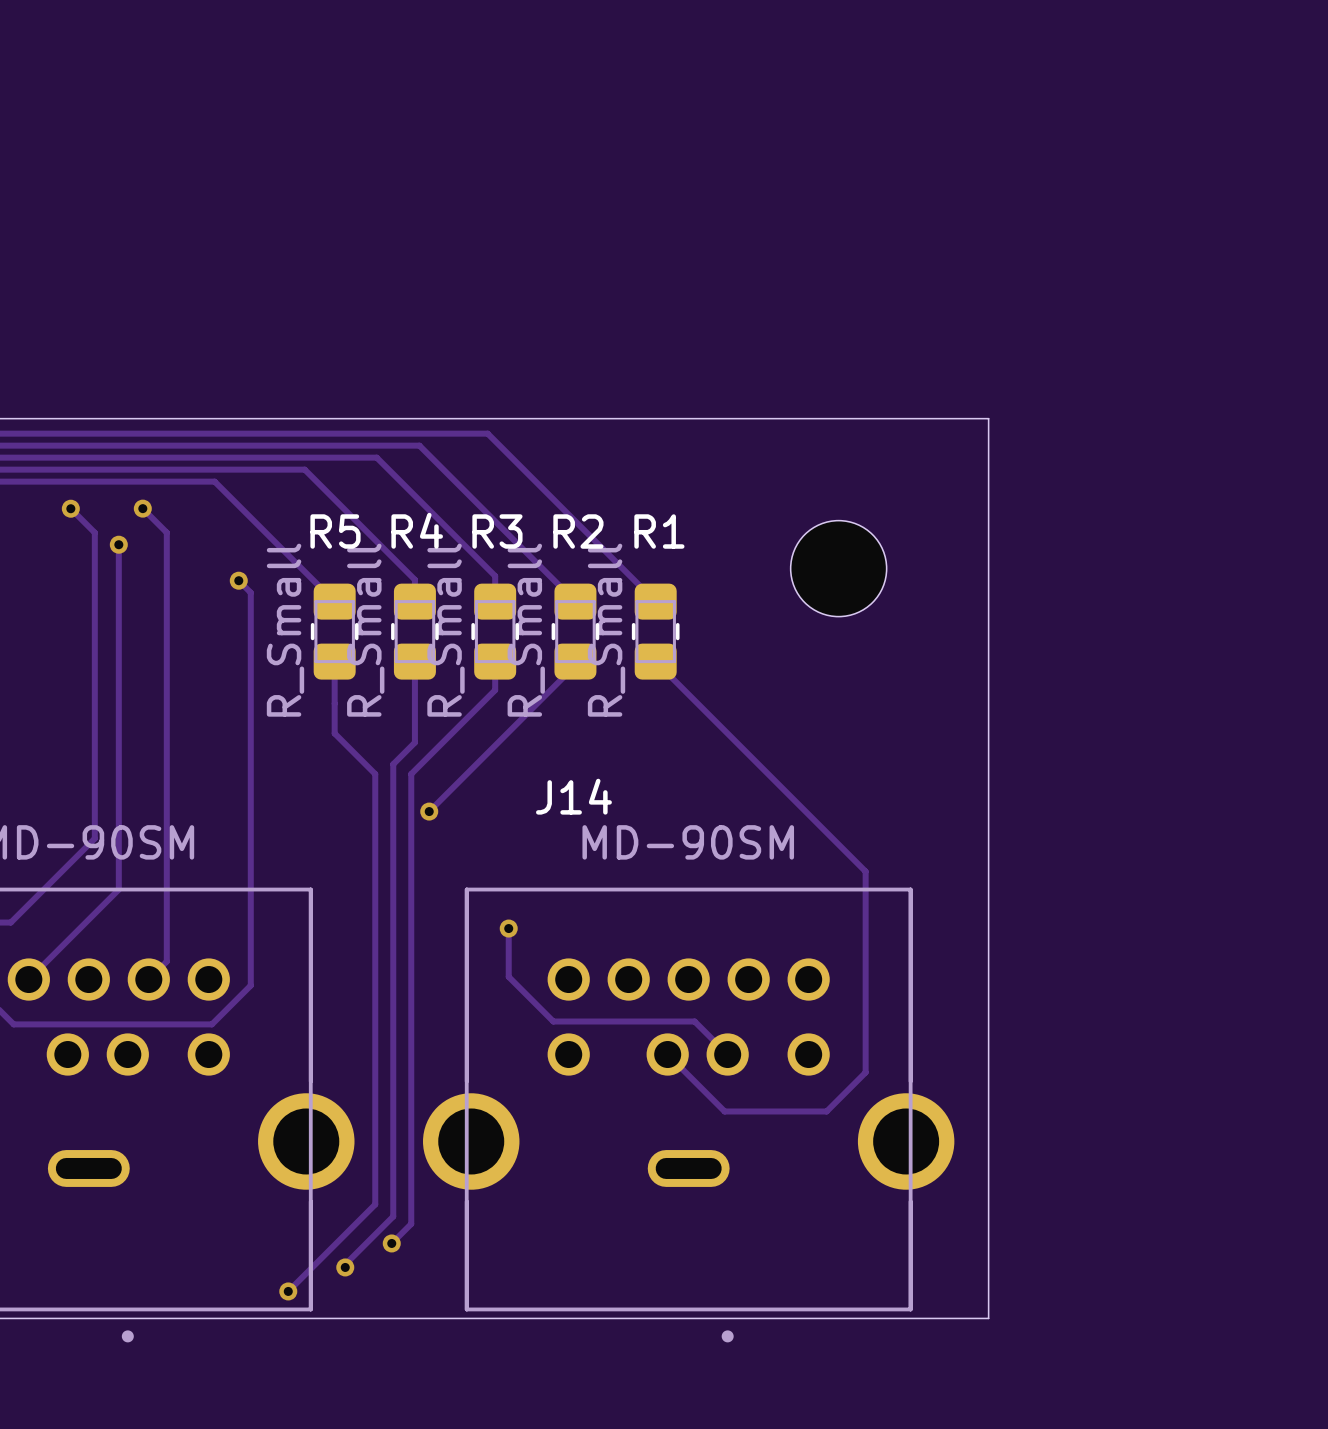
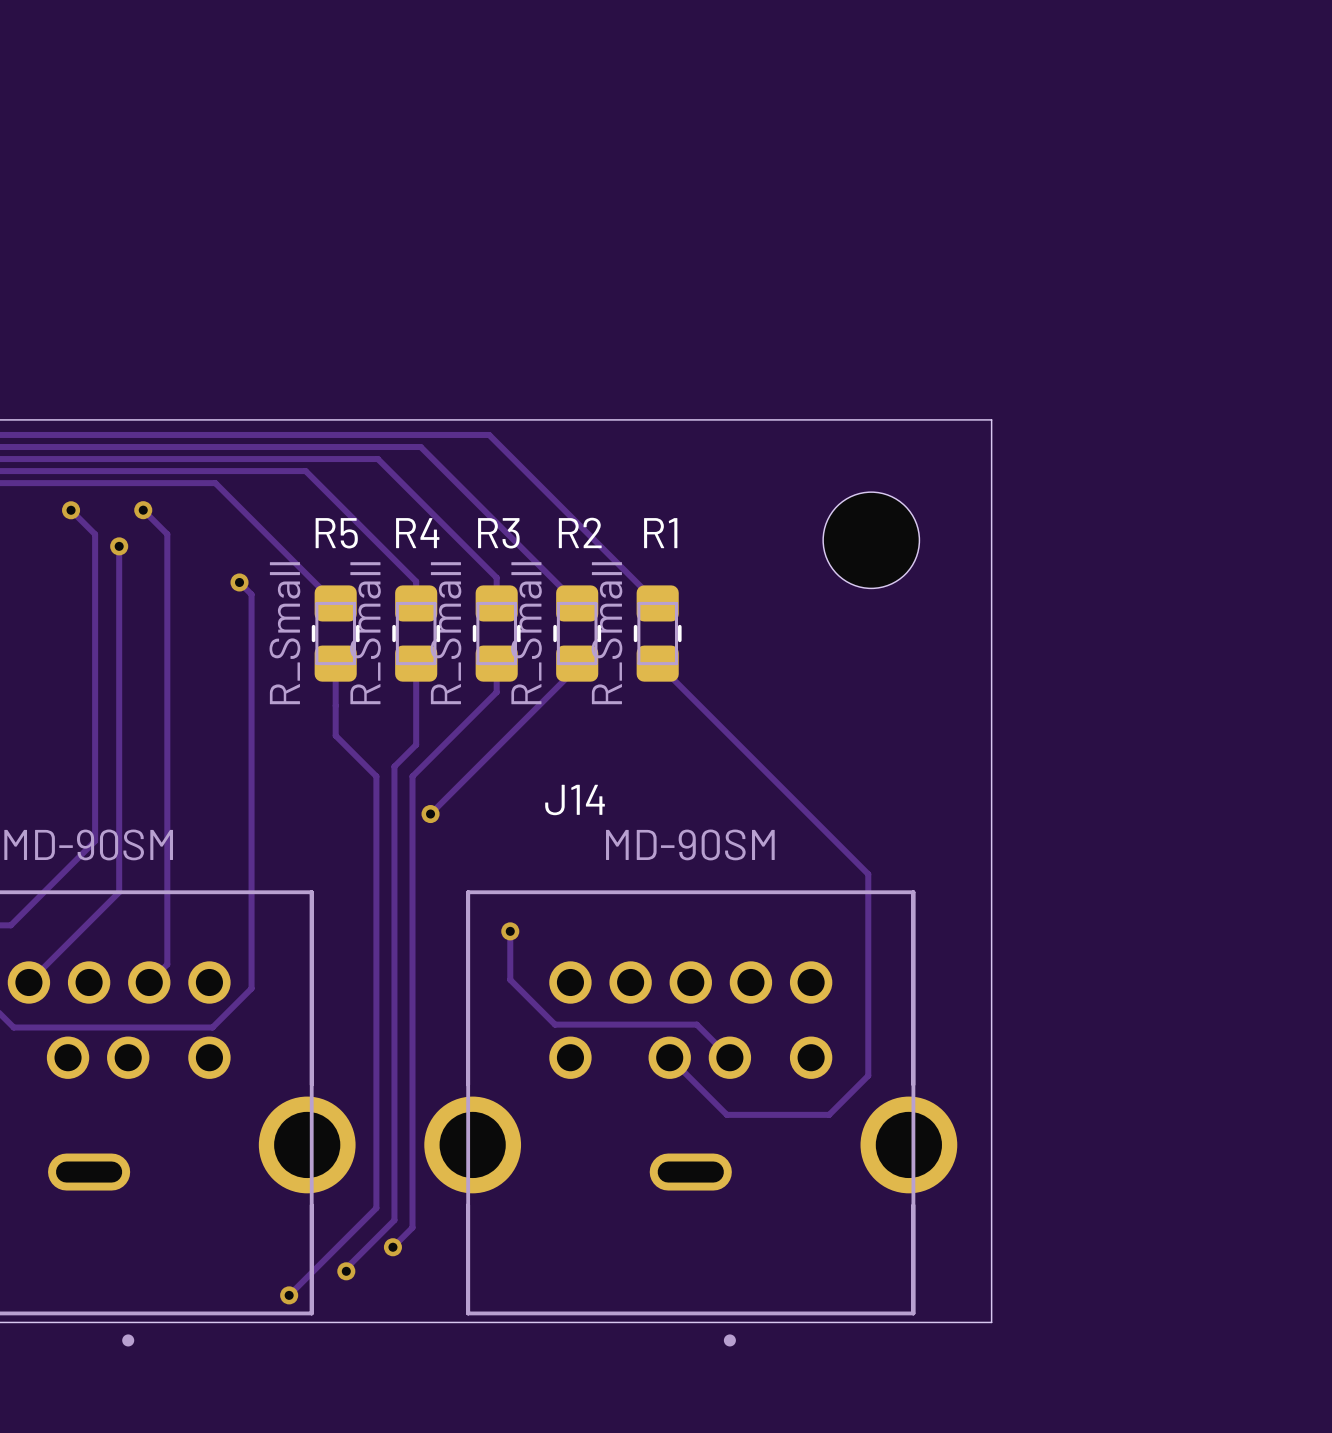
part position: (838, 568) -> (871, 540)

